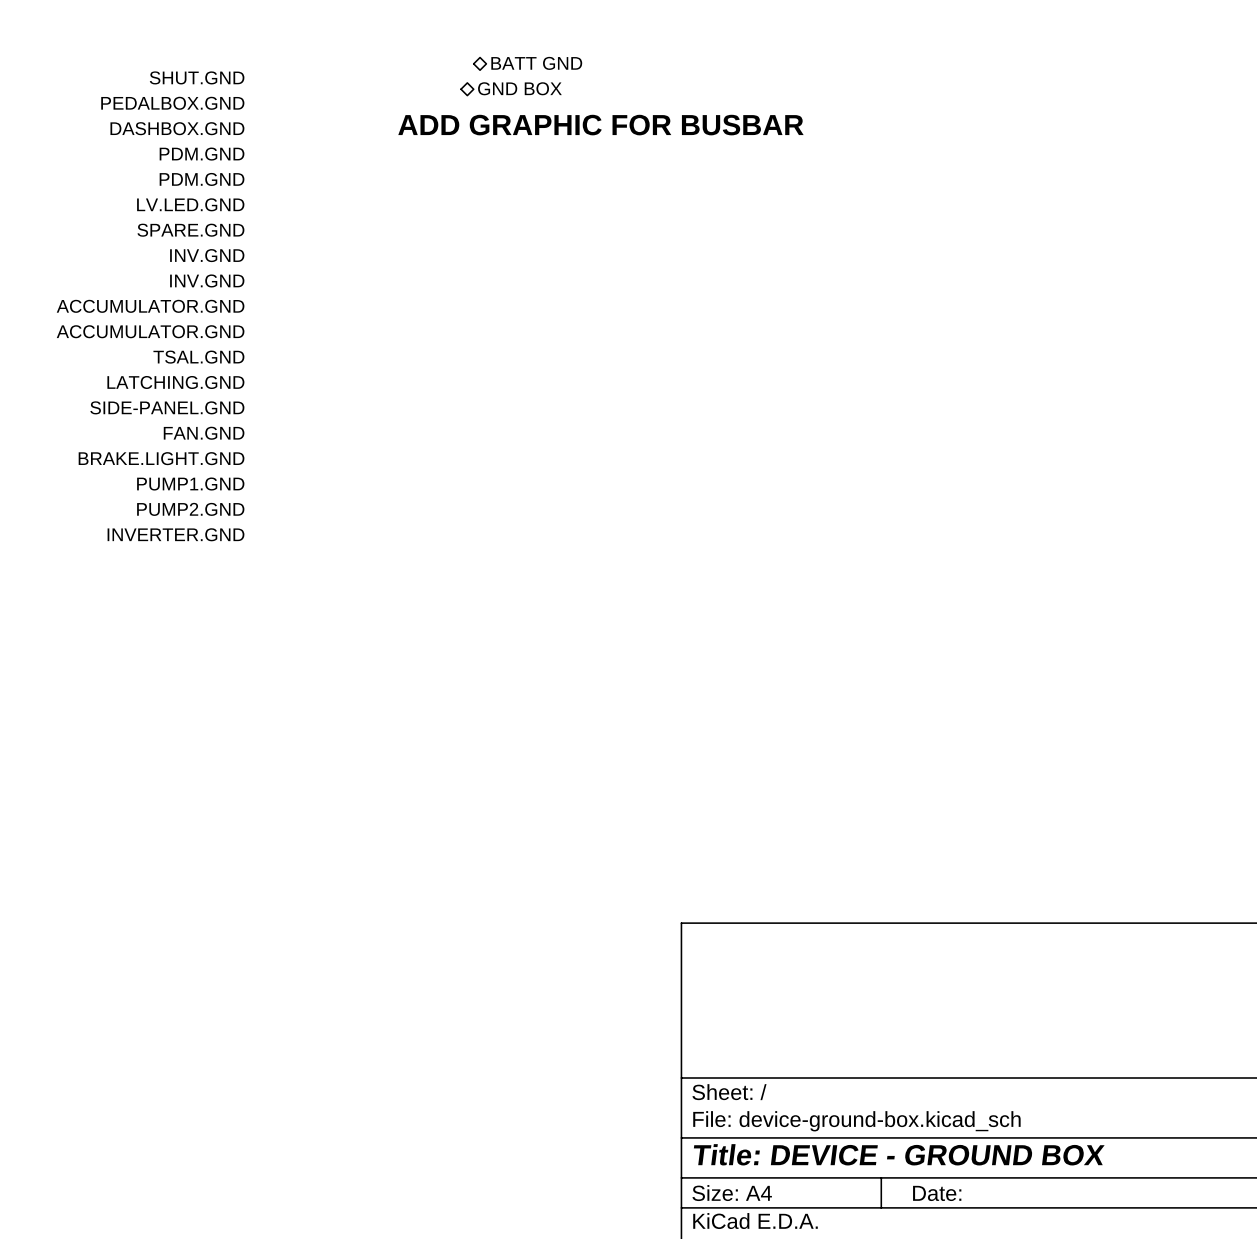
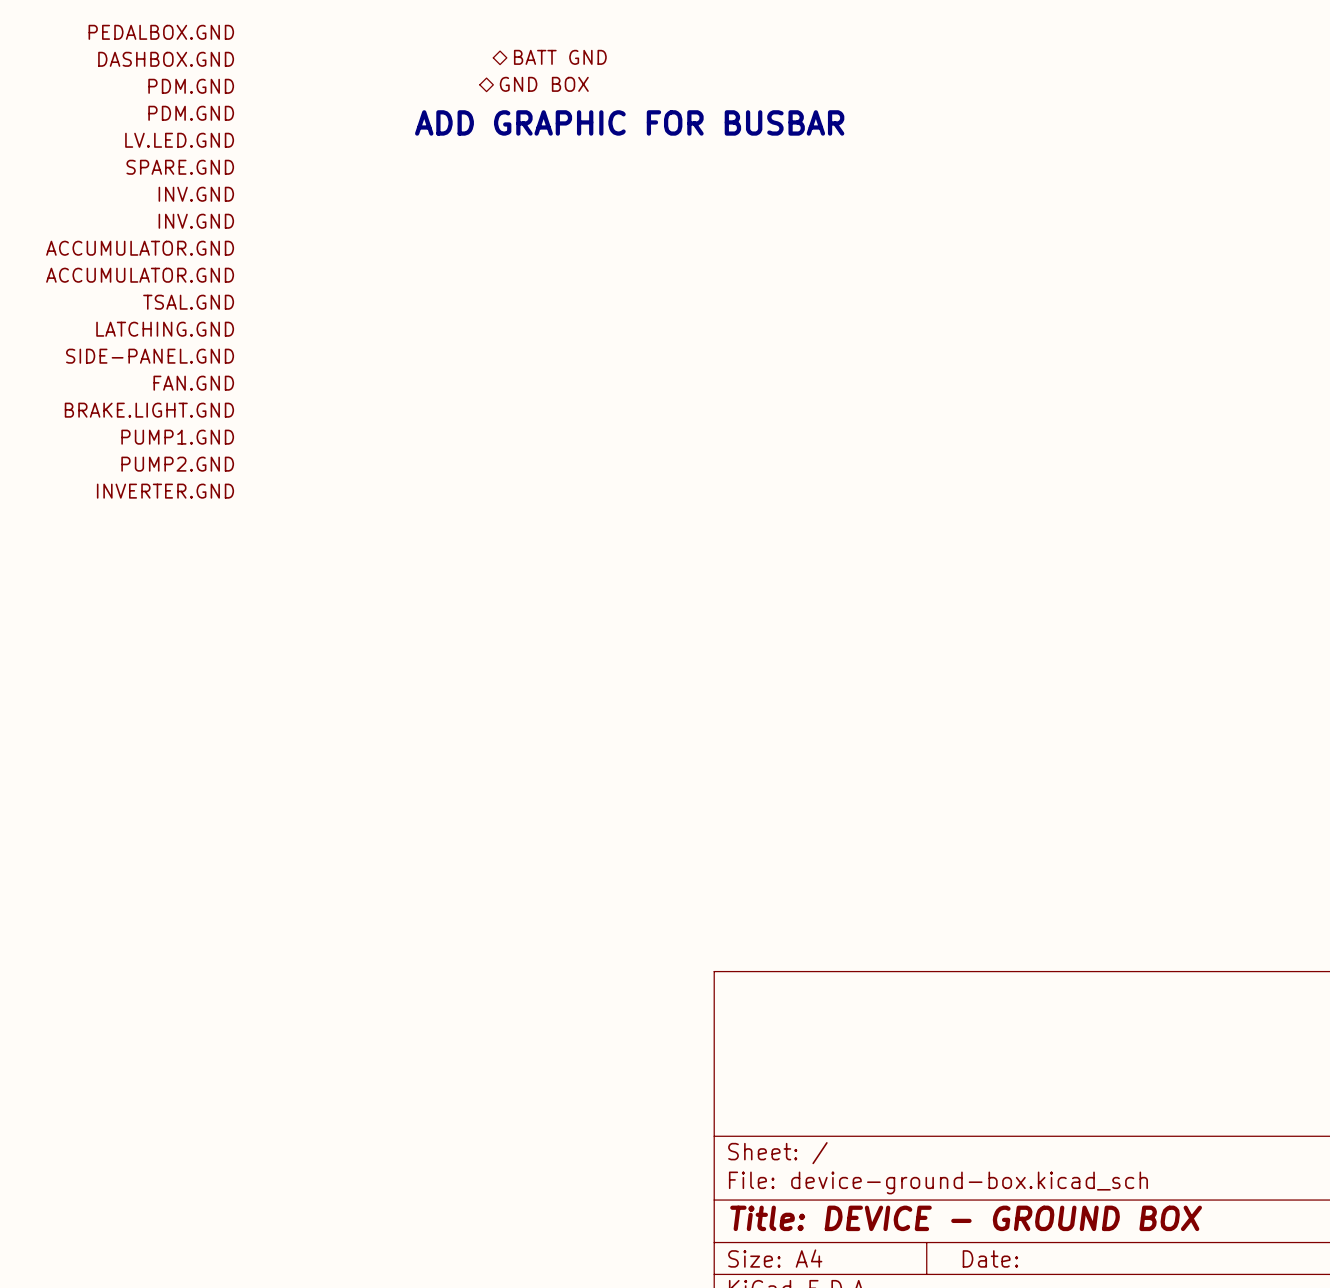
label: SHUT.GND (197, 77) -> none
label: none -> PDM.GND (191, 86)
label position: PEDALBOX.GND (172, 103) -> PEDALBOX.GND (161, 32)
label: none -> PDM.GND (191, 113)
label position: DASHBOX.GND (177, 128) -> DASHBOX.GND (166, 59)
label: PDM.GND (202, 154) -> none
label: PDM.GND (202, 179) -> none
label: none -> INV.GND (196, 194)
label position: LV.LED.GND (190, 204) -> LV.LED.GND (179, 140)
label: none -> INV.GND (196, 221)
label position: SPARE.GND (190, 230) -> SPARE.GND (180, 167)
label: none -> ACCUMULATOR.GND (140, 248)
label: INV.GND (207, 255) -> none
label: none -> ACCUMULATOR.GND (140, 275)
label: INV.GND (207, 280) -> none
label: ACCUMULATOR.GND (150, 306) -> none
label: ACCUMULATOR.GND (150, 331) -> none
label position: TSAL.GND (198, 357) -> TSAL.GND (188, 302)
label position: LATCHING.GND (175, 382) -> LATCHING.GND (165, 329)
label position: SIDE-PANEL.GND (167, 407) -> SIDE-PANEL.GND (150, 356)
label position: FAN.GND (204, 433) -> FAN.GND (193, 383)
label position: BRAKE.LIGHT.GND (161, 458) -> BRAKE.LIGHT.GND (149, 410)
label position: PUMP1.GND (190, 484) -> PUMP1.GND (177, 437)
label position: PUMP2.GND (190, 509) -> PUMP2.GND (177, 464)
label position: INVERTER.GND (175, 534) -> INVERTER.GND (165, 491)

